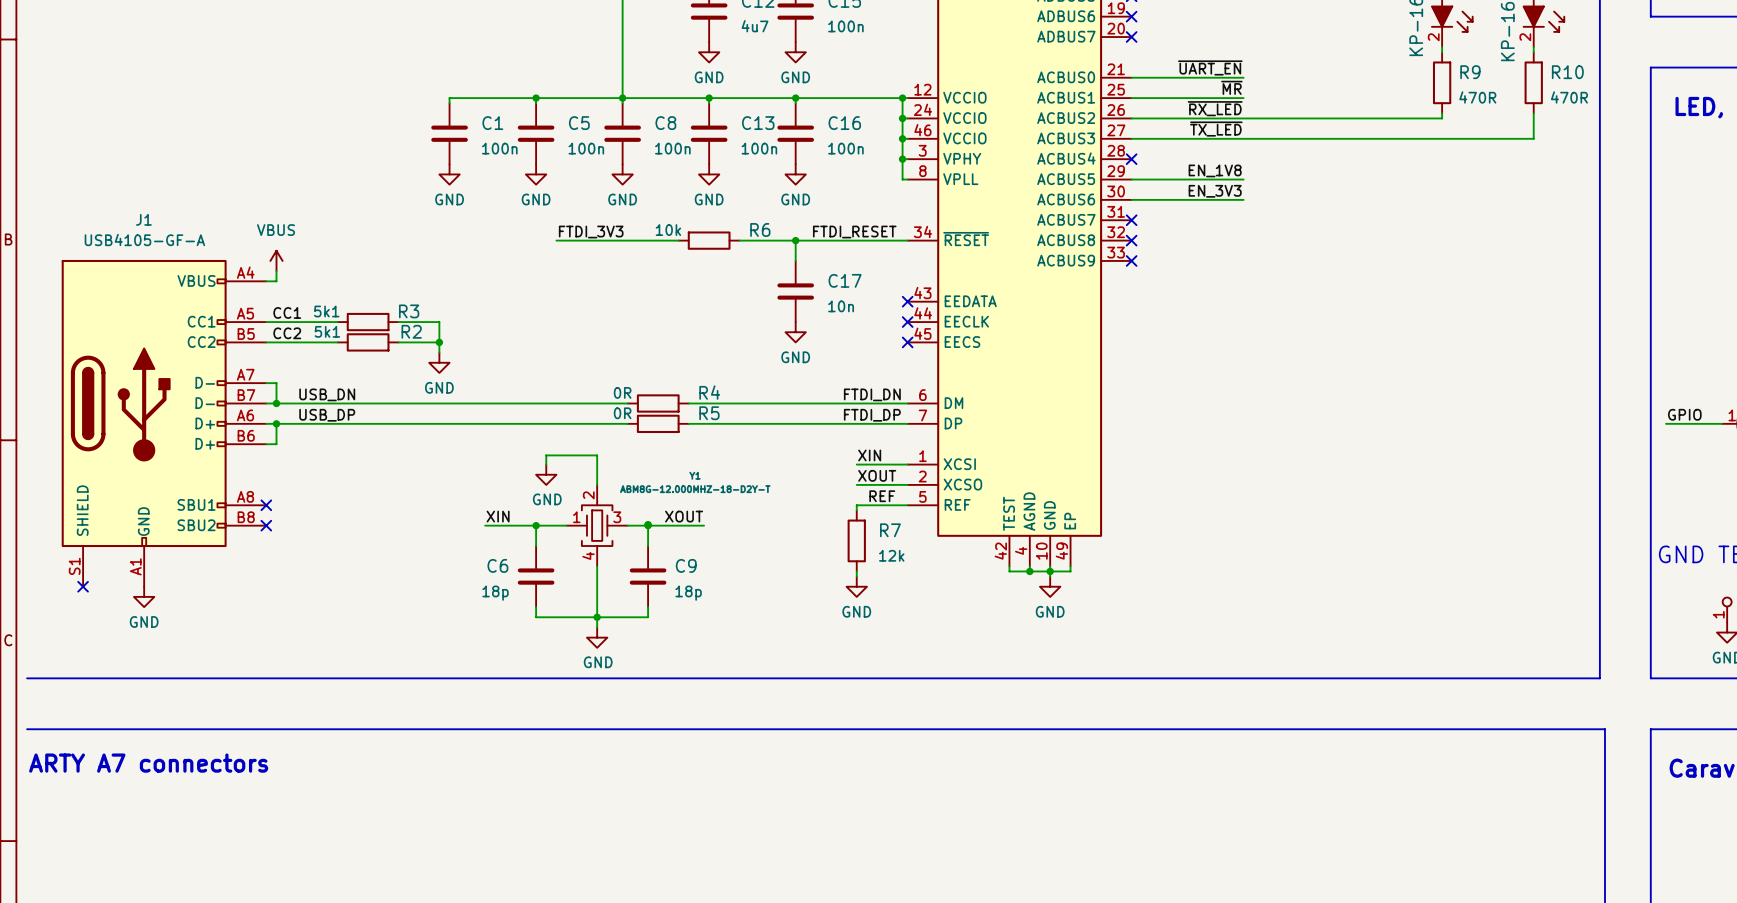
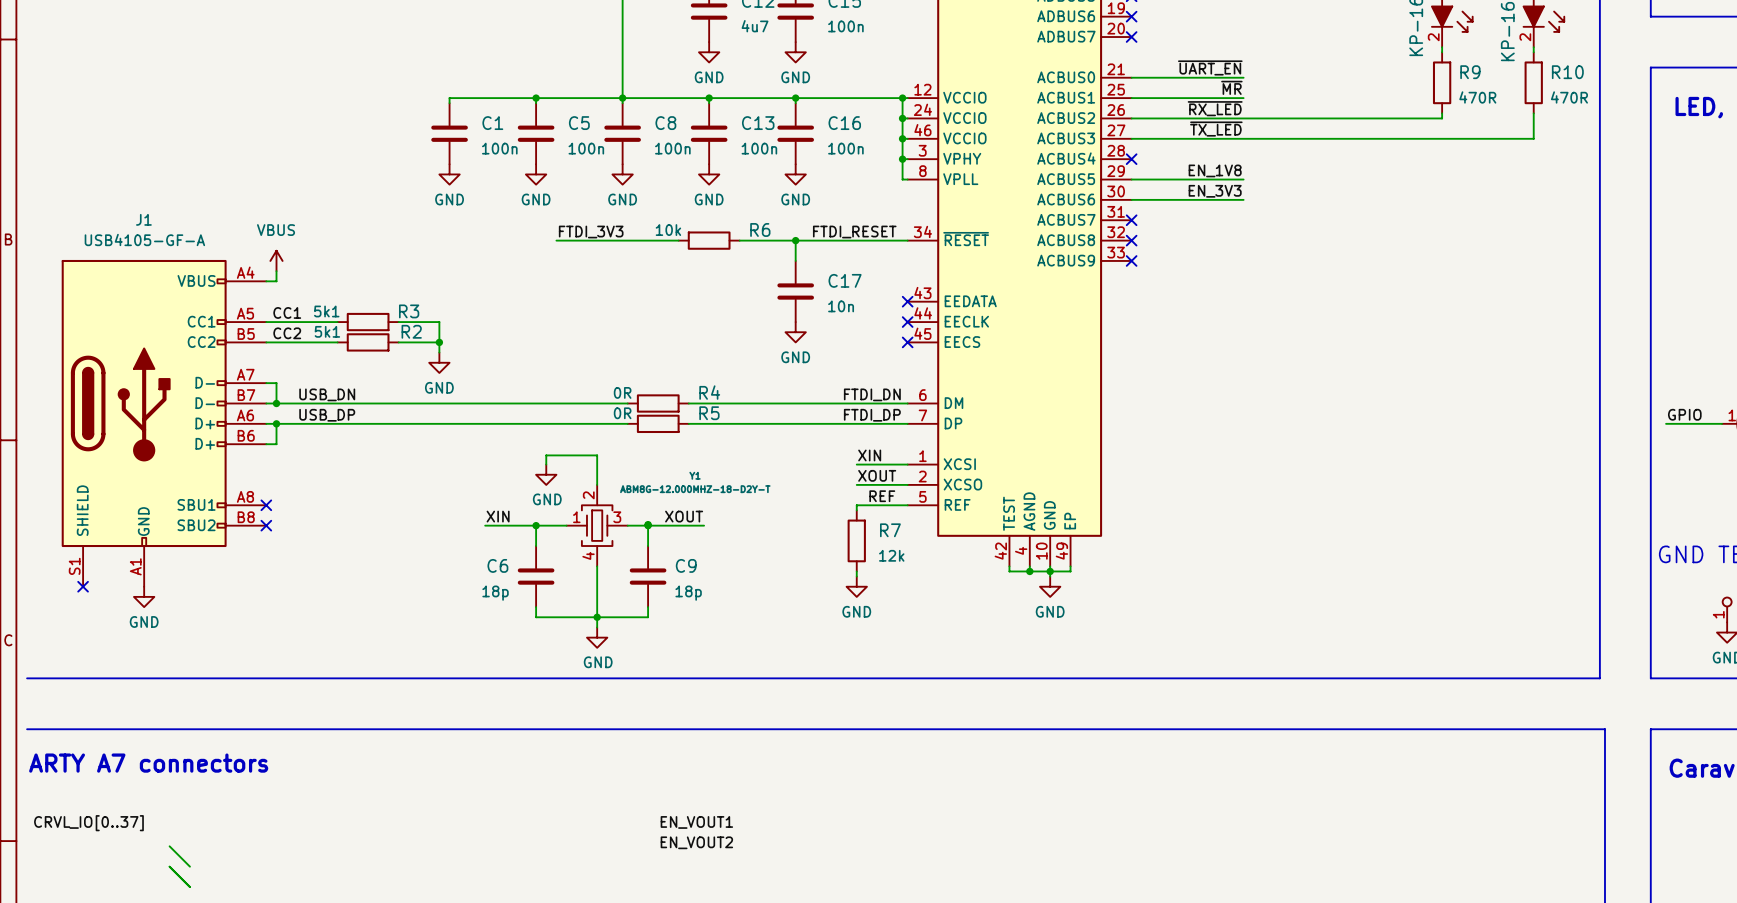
label: none -> EN_VOUT1 (696, 822)
label: none -> CRVL_IO[0..37] (88, 823)
label: none -> EN_VOUT2 (696, 842)
wire: none -> (169, 846) (189, 866)
wire: none -> (169, 866) (189, 887)

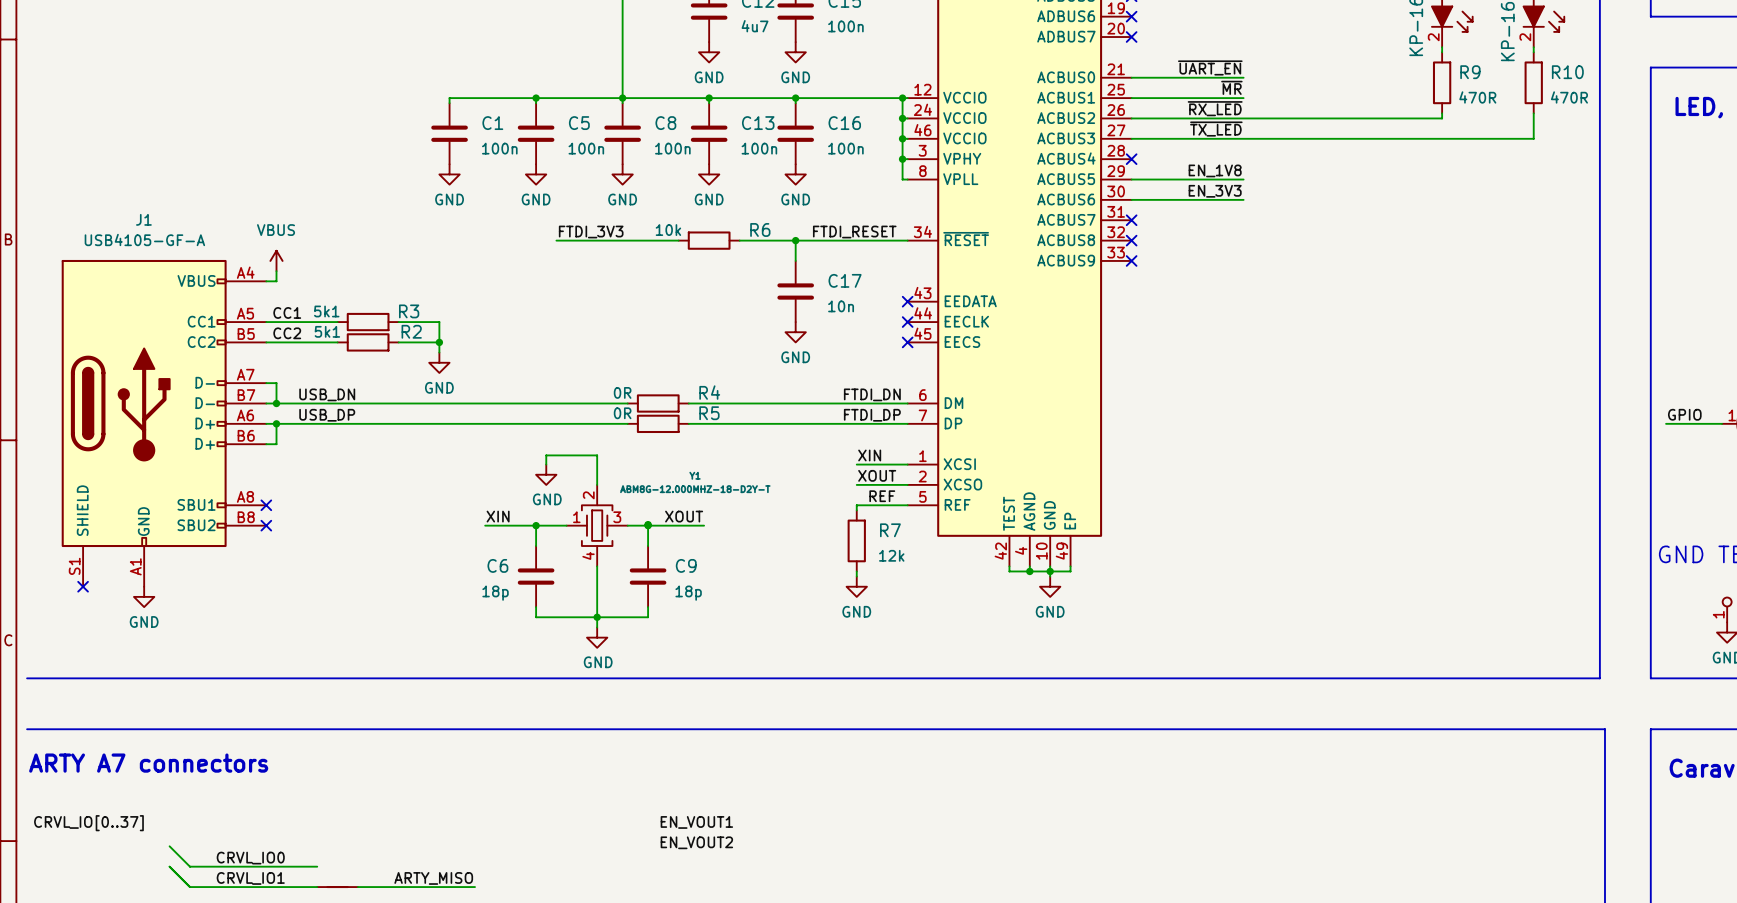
label: none -> CRVL_IO0 (250, 858)
wire: none -> (189, 866) (317, 866)
label: none -> CRVL_IO1 (250, 878)
label: none -> ARTY_MISO (433, 878)
wire: none -> (189, 887) (317, 887)
part: none -> (337, 887)
wire: none -> (357, 887) (475, 887)

